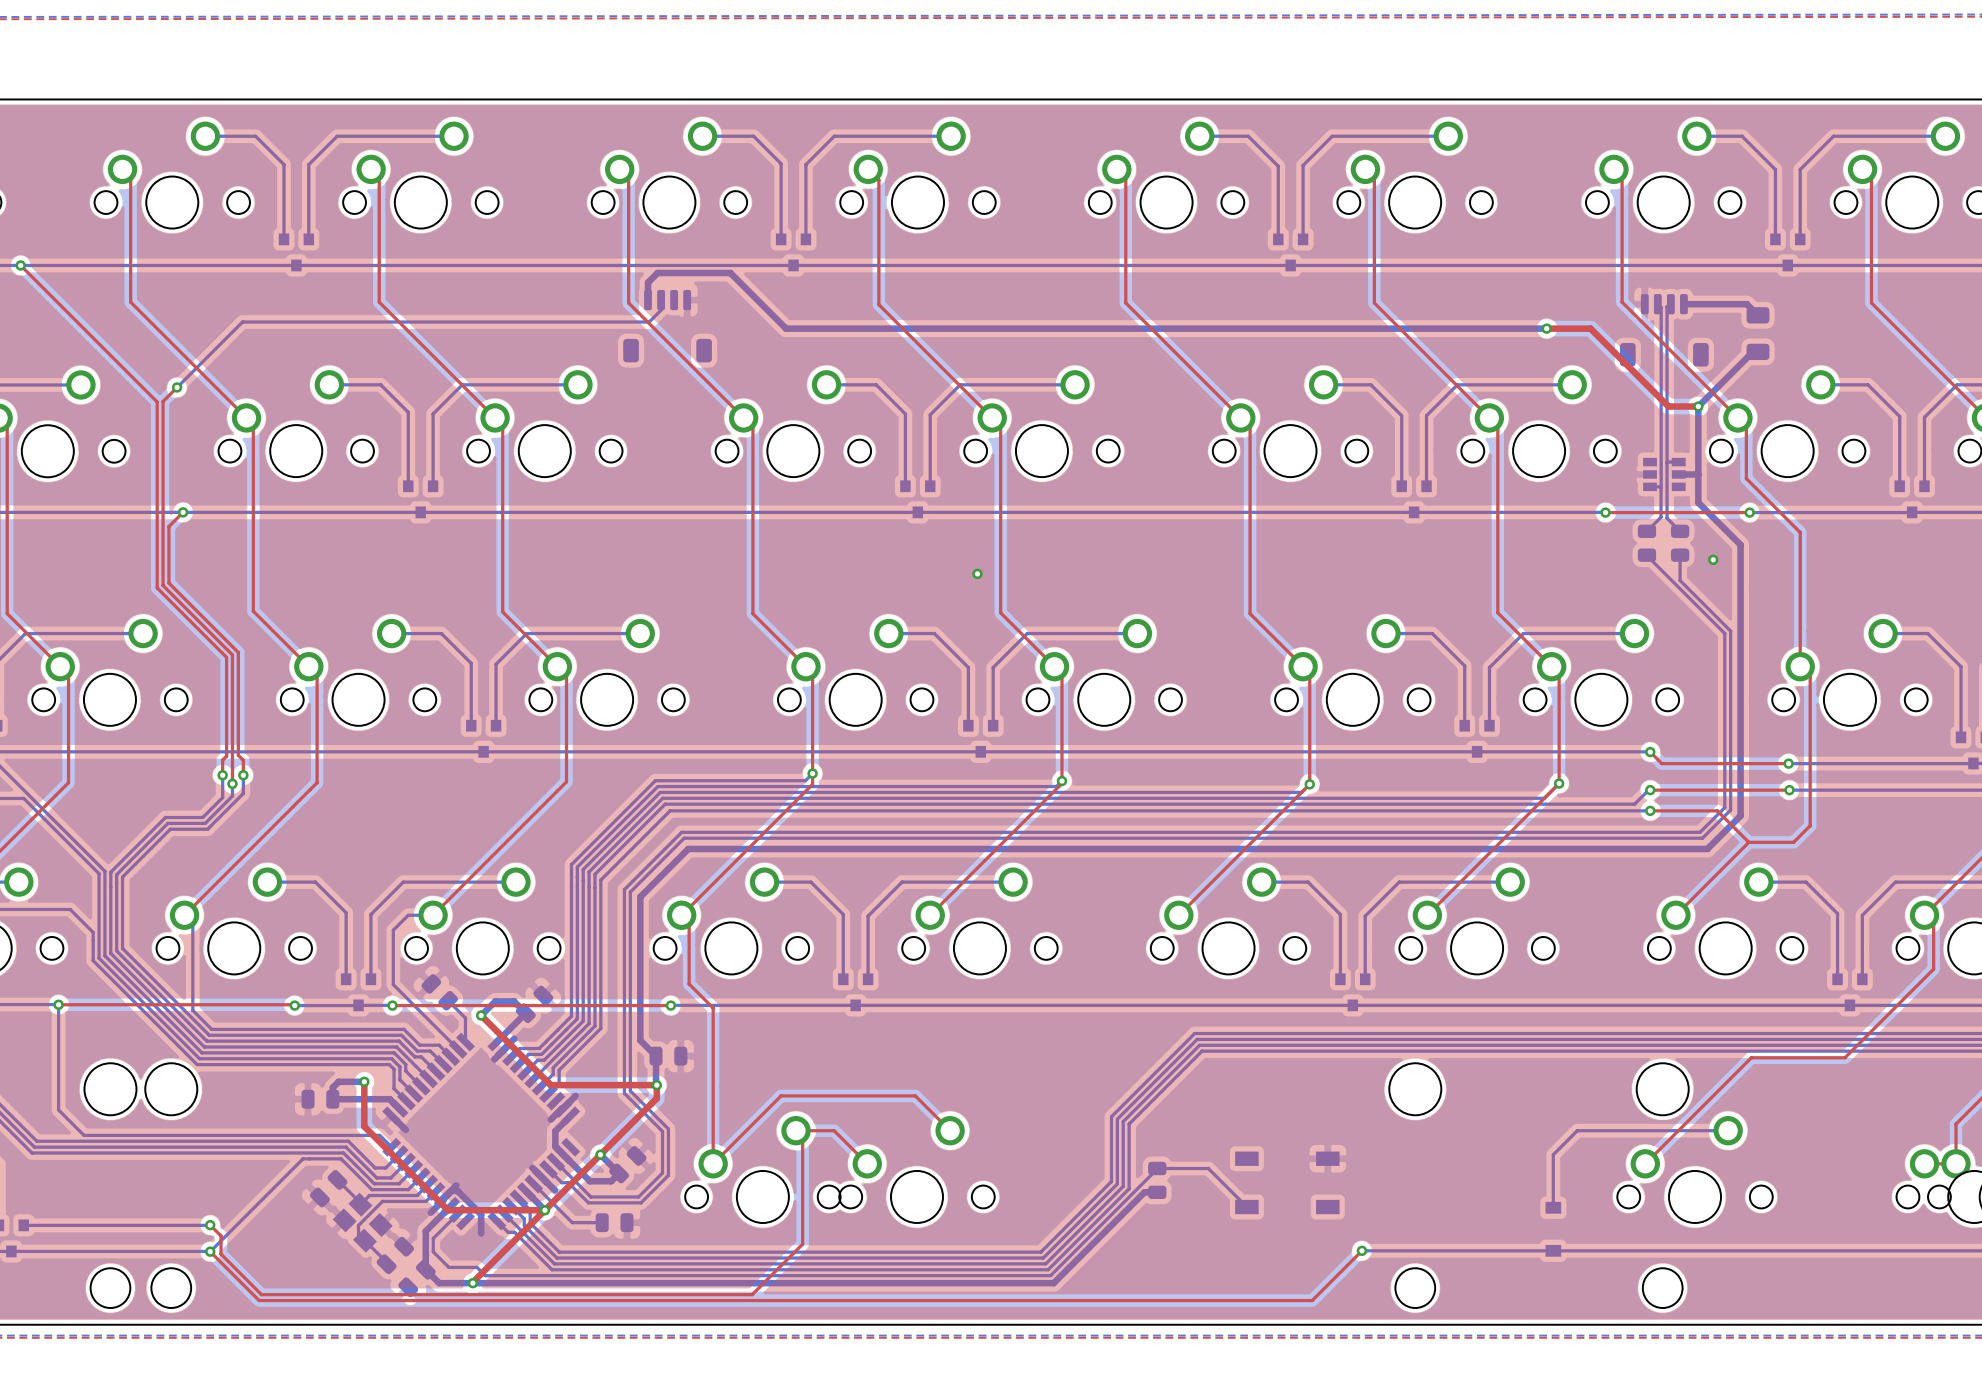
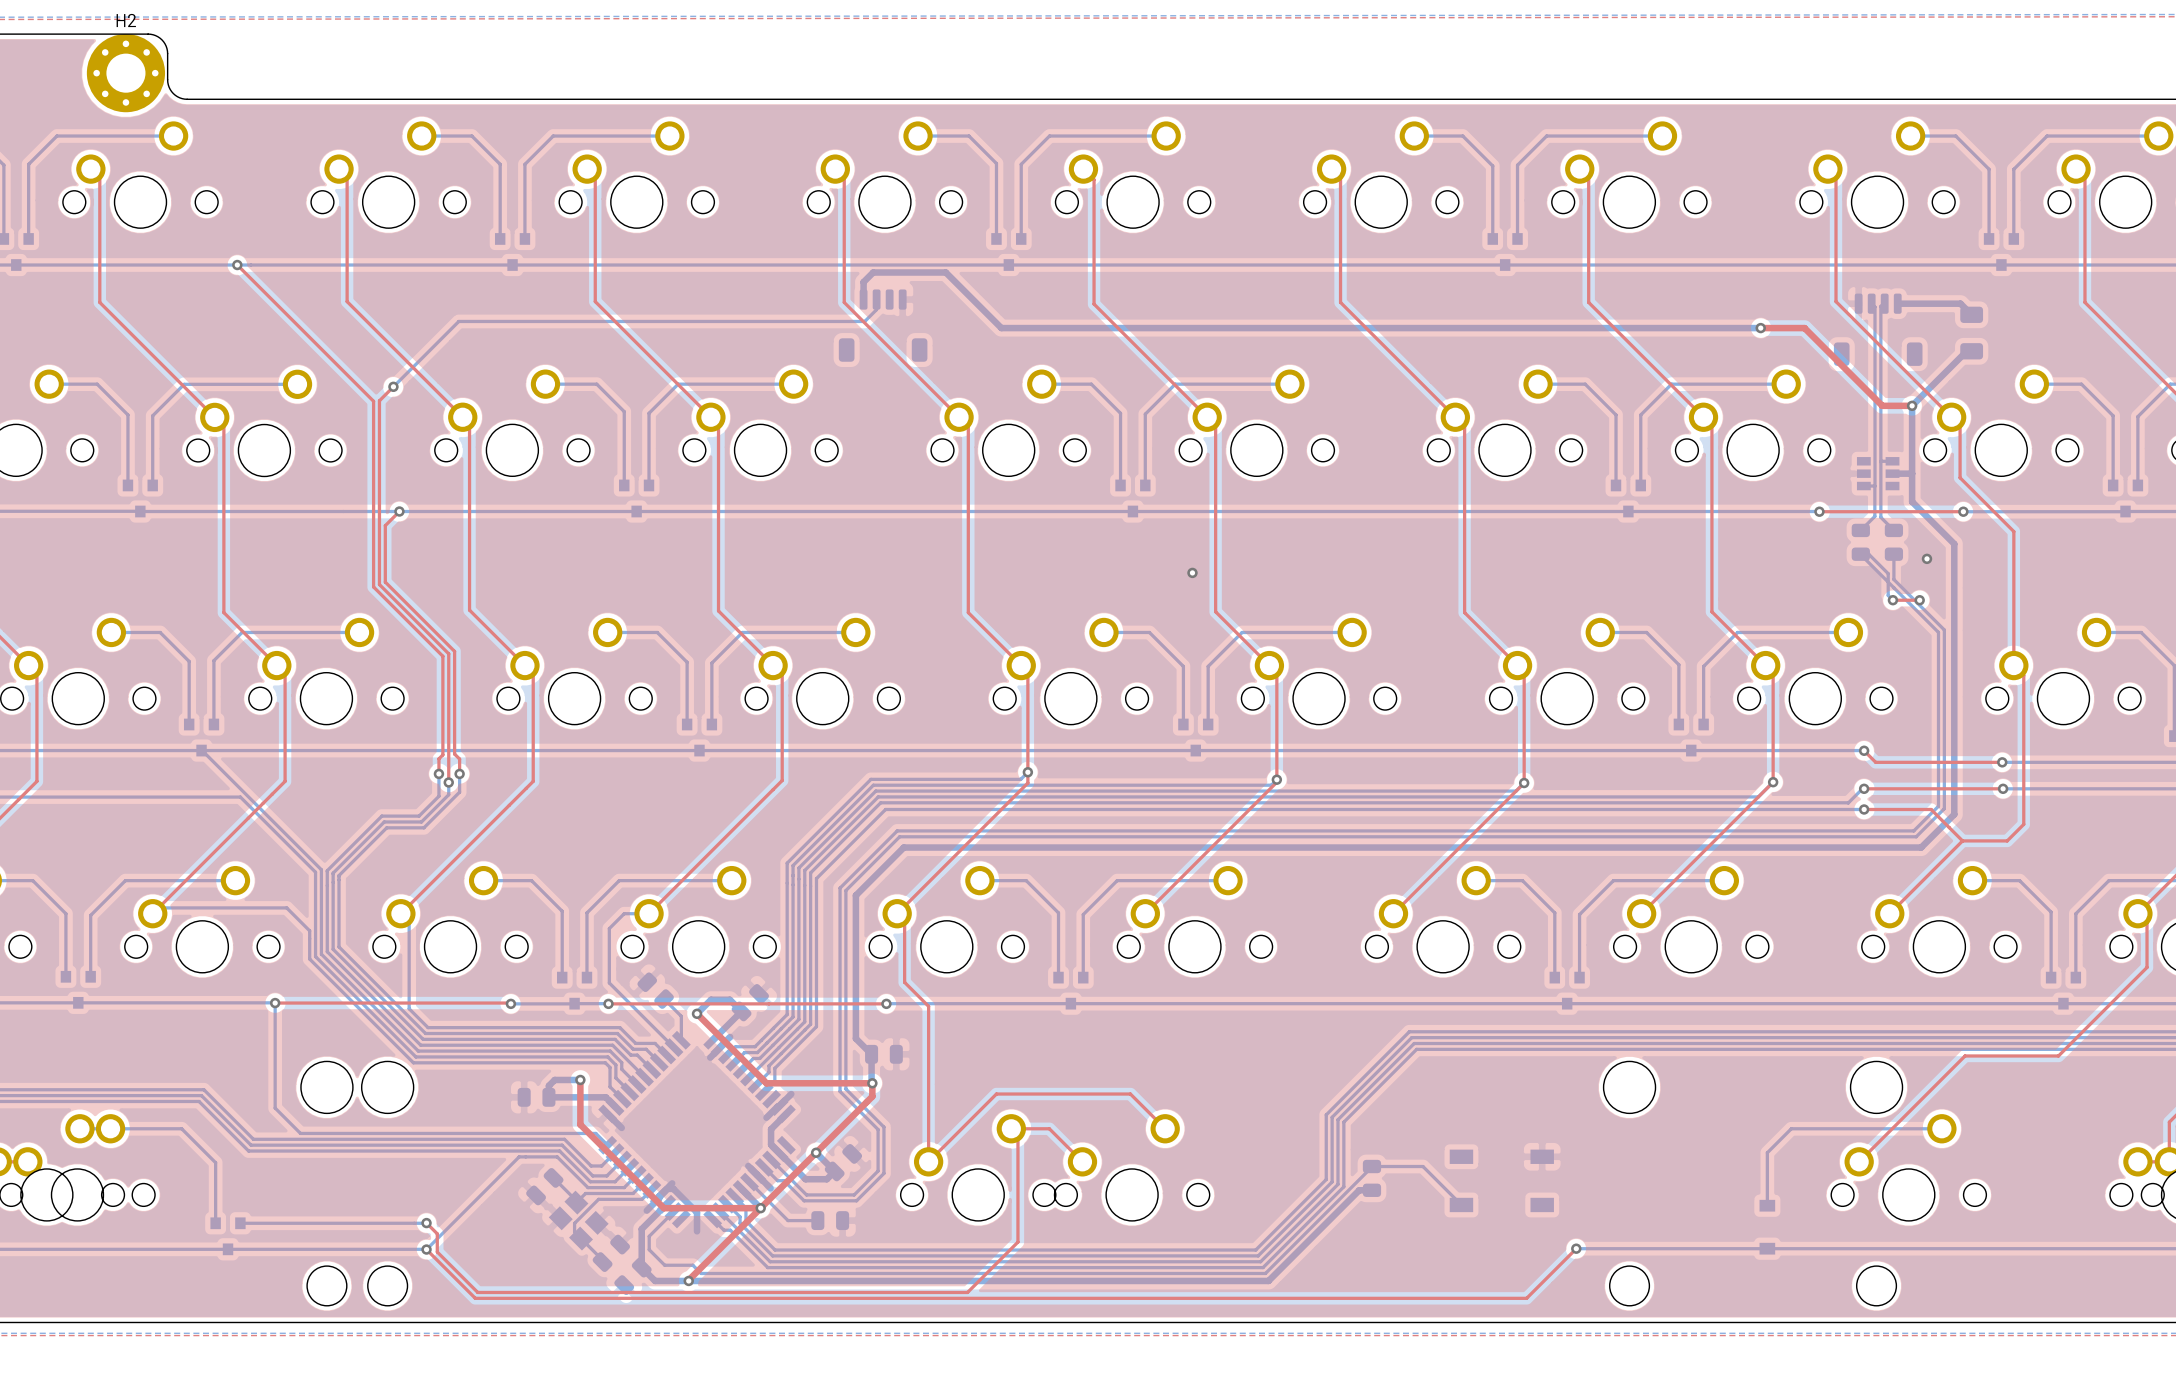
bottom track: none -> (1860, 554) (1868, 554) (1888, 573) (1888, 595) (1892, 600)
top track: none -> (1892, 600) (1919, 600)
via: none -> (1892, 600)
via: none -> (1919, 600)

